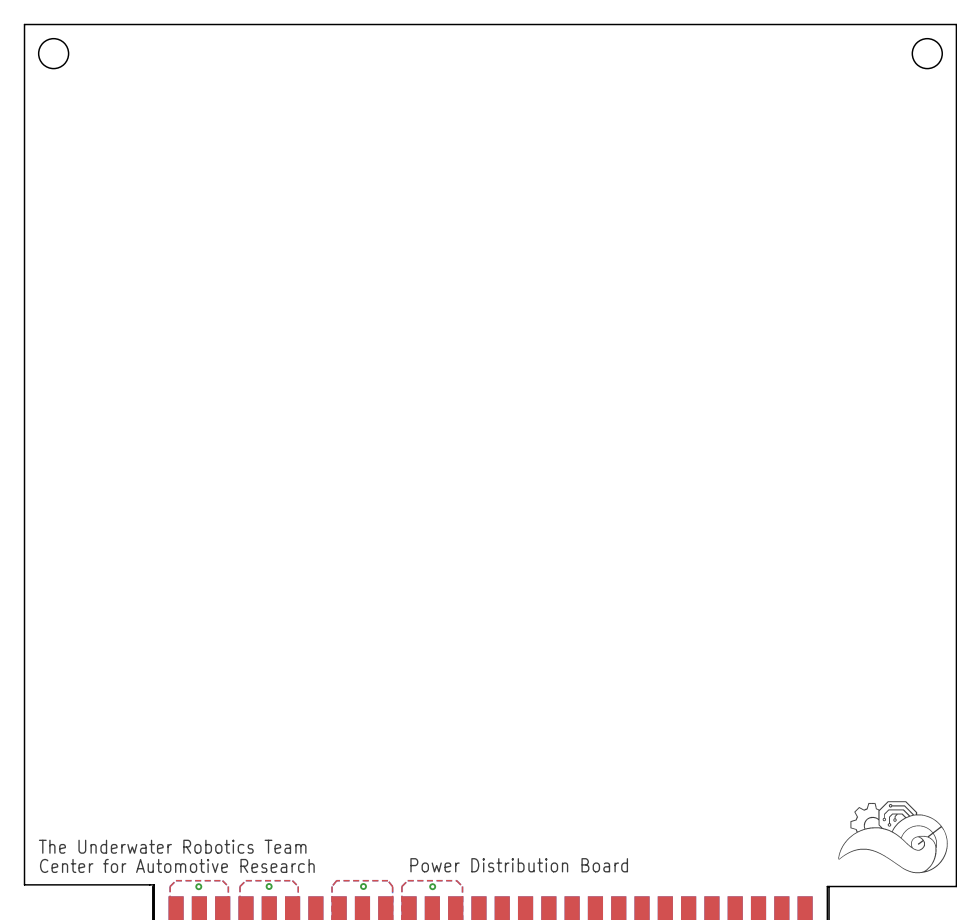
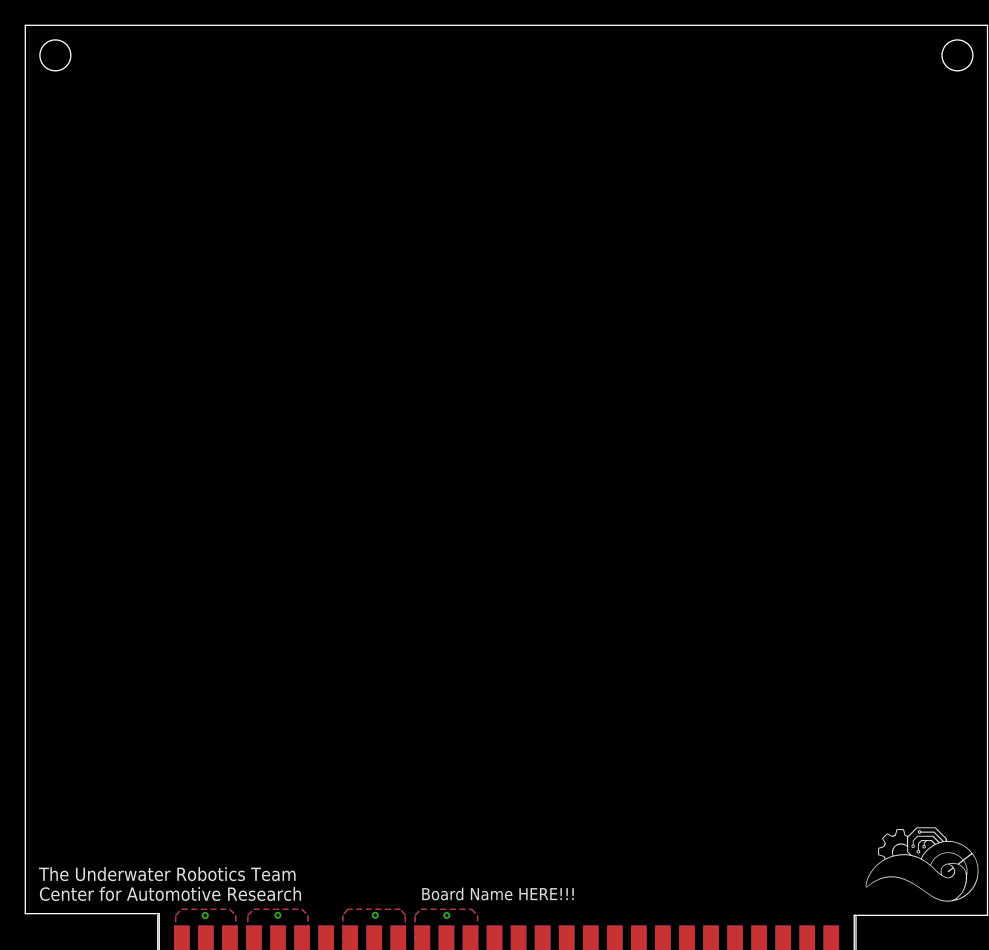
text: Power Distribution Board (519, 865) -> Board Name HERE!!! (498, 893)

